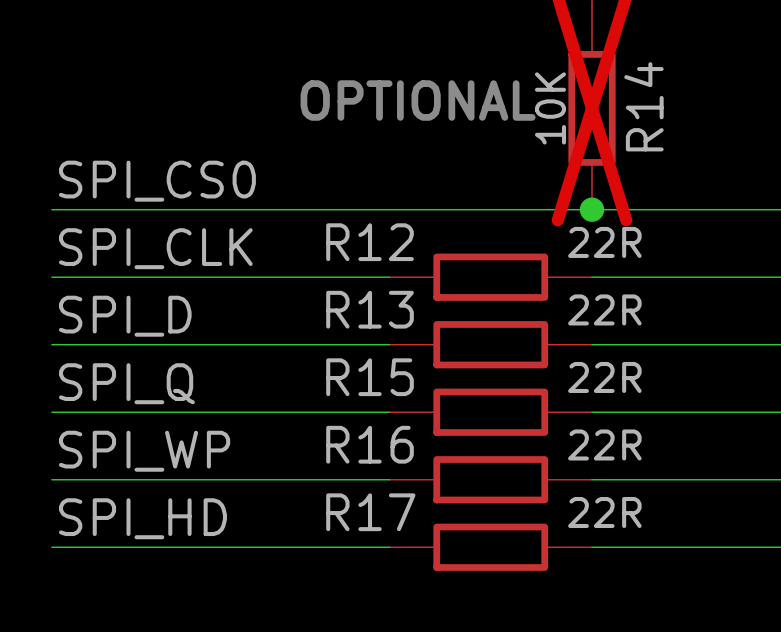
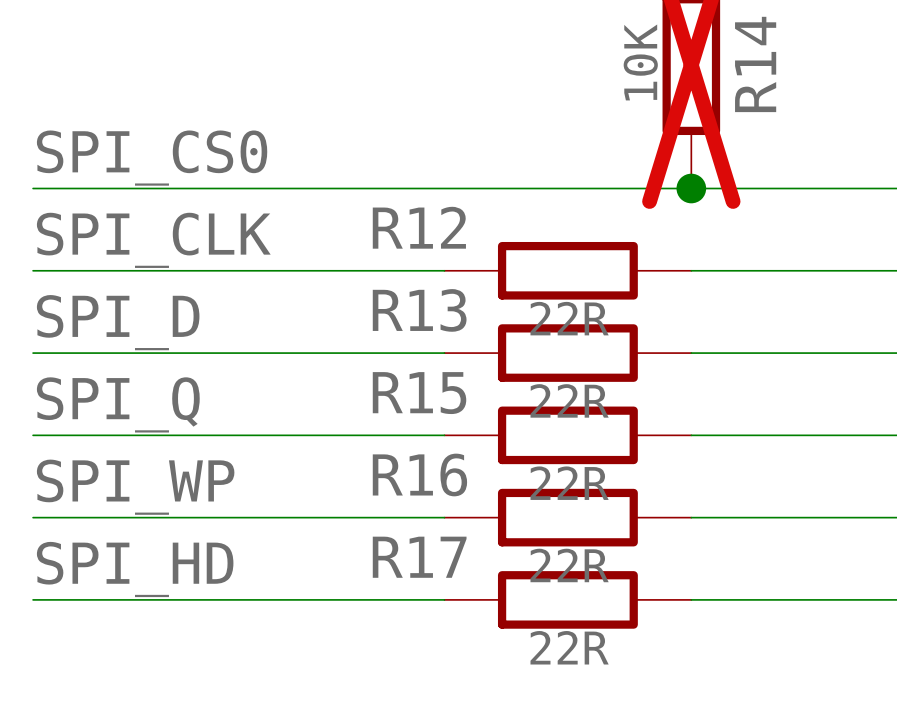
text: OPTIONAL (418, 100) -> none
R12 value position: 22R (604, 242) -> 22R (569, 318)
R13 value position: 22R (604, 309) -> 22R (569, 400)
R15 value position: 22R (604, 377) -> 22R (569, 483)
R16 value position: 22R (604, 444) -> 22R (569, 565)
R17 value position: 22R (604, 512) -> 22R (569, 647)

